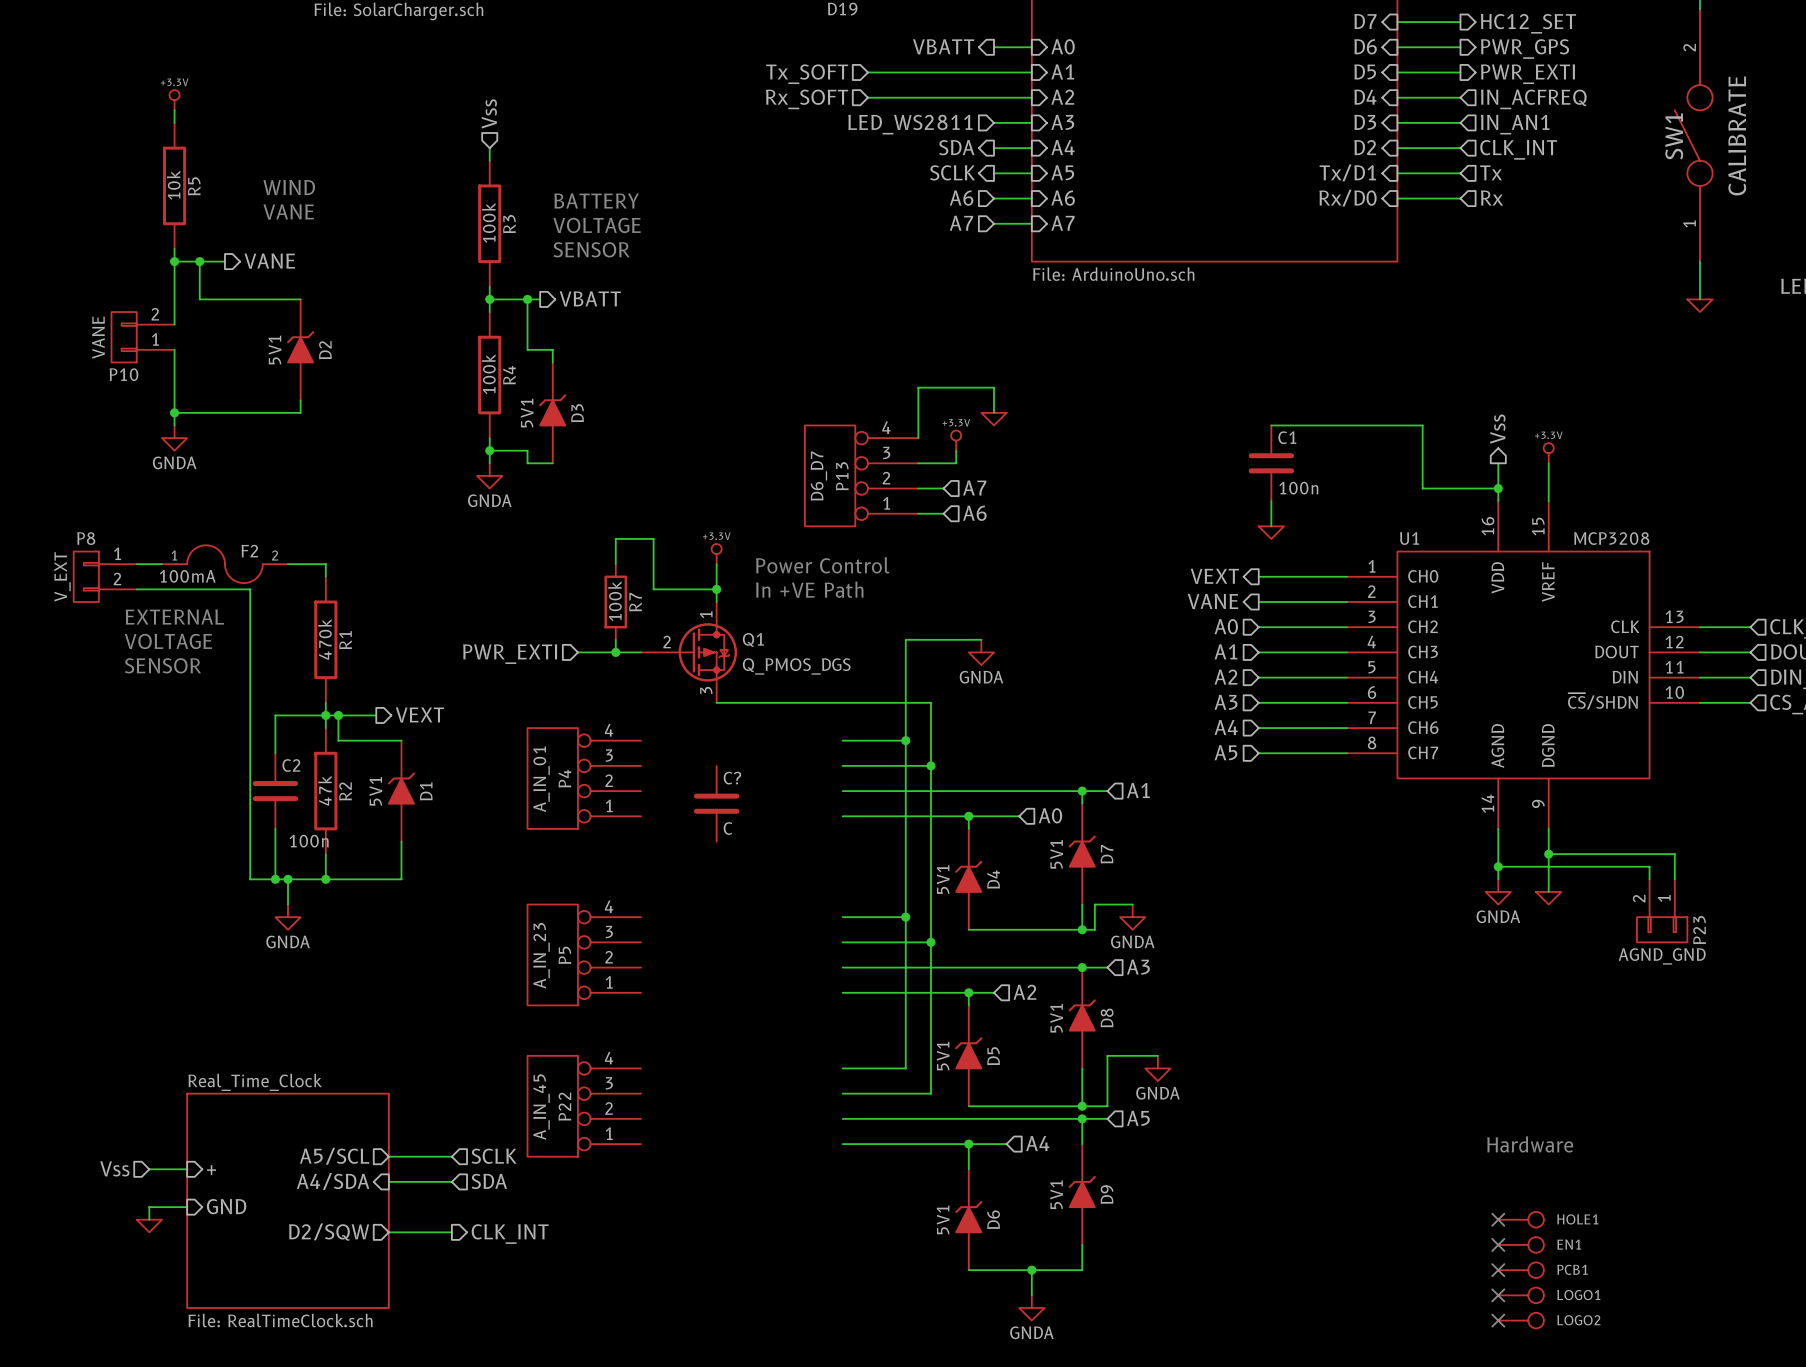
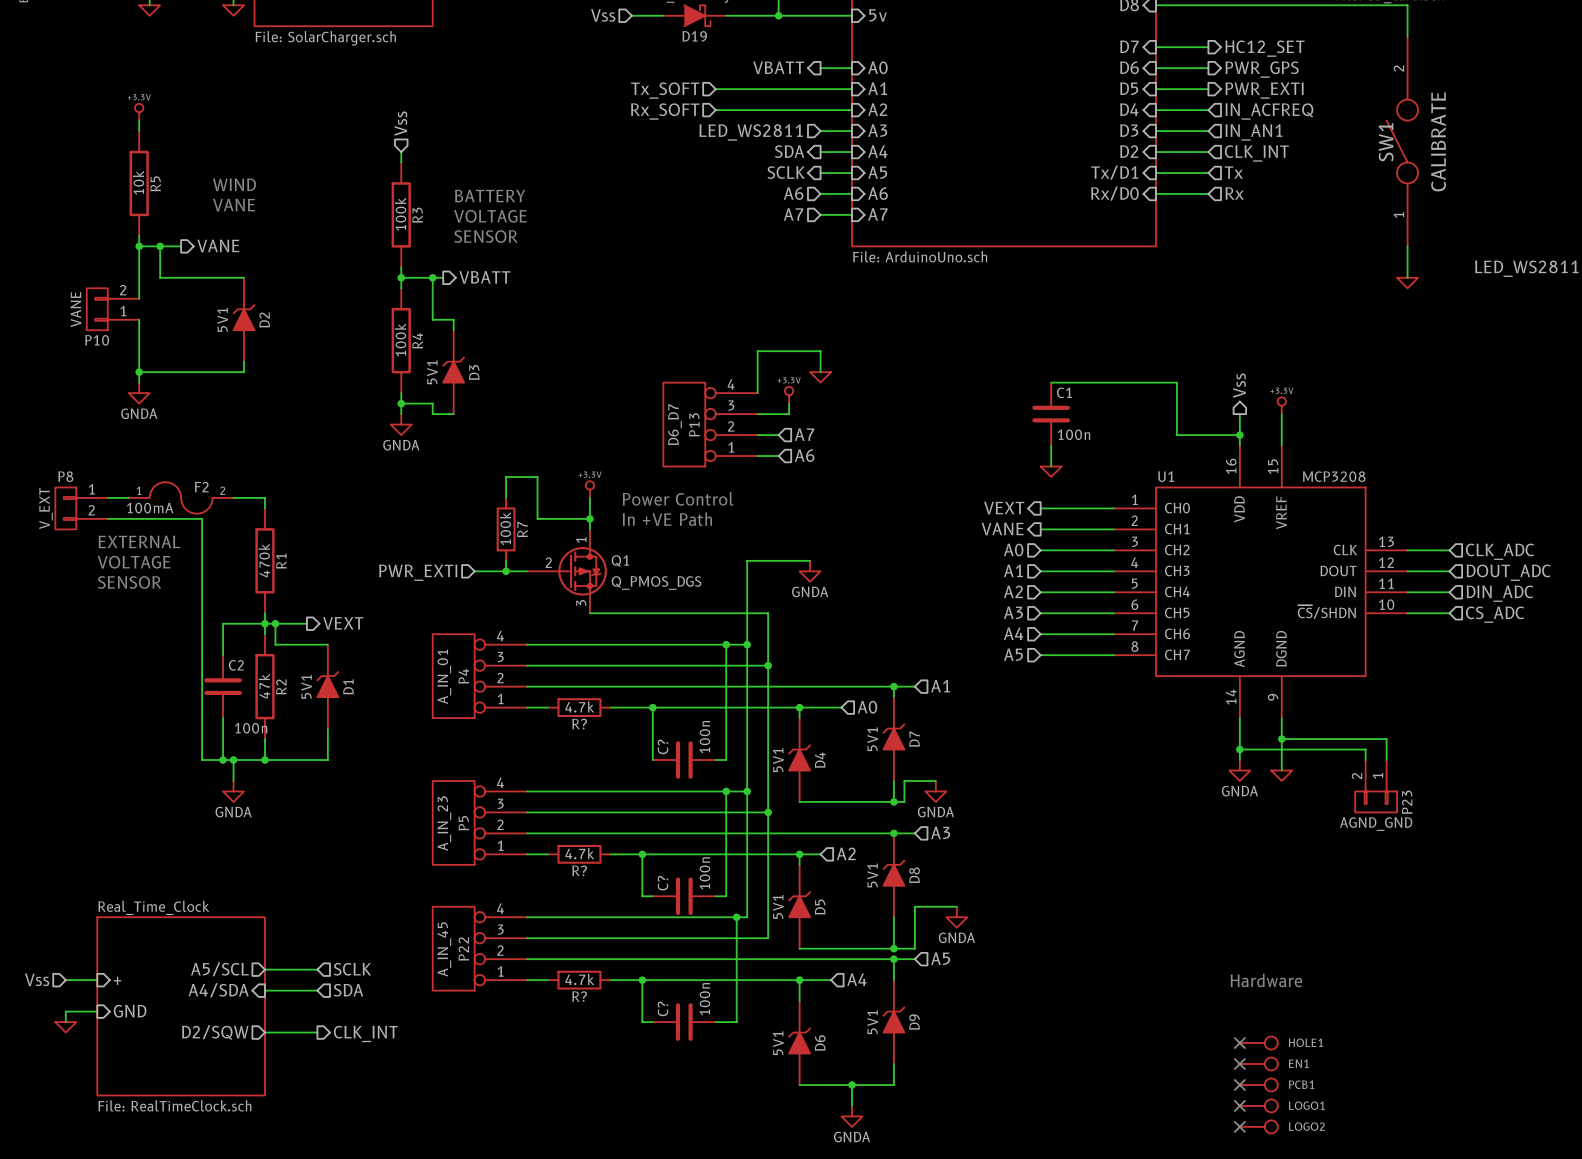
wire: none -> (527, 644) (694, 644)
wire: none -> (726, 644) (726, 760) (715, 760)
junction: none -> (726, 644)
wire: none -> (527, 665) (694, 665)
wire: none -> (527, 686) (694, 686)
C?: C (716, 803) -> none
wire: none -> (527, 707) (548, 707)
R?: none -> 4.7k (579, 707)
wire: none -> (610, 707) (694, 707)
wire: none -> (652, 707) (652, 760)
junction: none -> (652, 707)
C?: none -> 100n (684, 760)
wire: none -> (527, 791) (694, 791)
wire: none -> (726, 791) (726, 896) (715, 896)
junction: none -> (726, 791)
wire: none -> (527, 812) (694, 812)
wire: none -> (527, 833) (694, 833)
wire: none -> (527, 854) (548, 854)
R?: none -> 4.7k (579, 854)
wire: none -> (610, 854) (694, 854)
wire: none -> (642, 854) (642, 896) (652, 896)
junction: none -> (642, 854)
C?: none -> 100n (684, 896)
wire: none -> (527, 917) (694, 917)
wire: none -> (736, 917) (736, 1022) (715, 1022)
junction: none -> (736, 917)
wire: none -> (527, 938) (694, 938)
wire: none -> (527, 959) (694, 959)
wire: none -> (527, 980) (548, 980)
R?: none -> 4.7k (579, 980)
wire: none -> (610, 980) (694, 980)
wire: none -> (642, 980) (642, 1022) (652, 1022)
junction: none -> (642, 980)
sheet pin position: A5/SCL (334, 1156) -> A5/SCL (219, 969)
wire: (388, 1156) (451, 1156) -> (317, 990) (264, 990)
hierarchical label position: SCLK (494, 1156) -> SCLK (352, 969)
hierarchical label position: Vss (114, 1168) -> Vss (37, 979)
wire: (149, 1169) (187, 1169) -> (65, 980) (97, 980)
sheet pin position: + (211, 1170) -> + (117, 980)
sheet pin position: A4/SDA (333, 1181) -> A4/SDA (218, 990)
wire: (388, 1181) (451, 1181) -> (264, 969) (317, 969)
hierarchical label position: SDA (489, 1181) -> SDA (348, 990)
C?: none -> 100n (684, 1022)
sheet Real_Time_Clock position: (288, 1200) -> (181, 1006)
sheet pin position: GND (226, 1206) -> GND (130, 1011)
wire: (187, 1207) (149, 1207) (149, 1219) -> (97, 1011) (65, 1011) (65, 1022)
power symbol position: (149, 1226) -> (65, 1027)
sheet pin position: D2/SQW (329, 1232) -> D2/SQW (215, 1032)
wire: (388, 1232) (451, 1232) -> (264, 1032) (317, 1032)
hierarchical label position: CLK_INT (510, 1234) -> CLK_INT (365, 1033)

